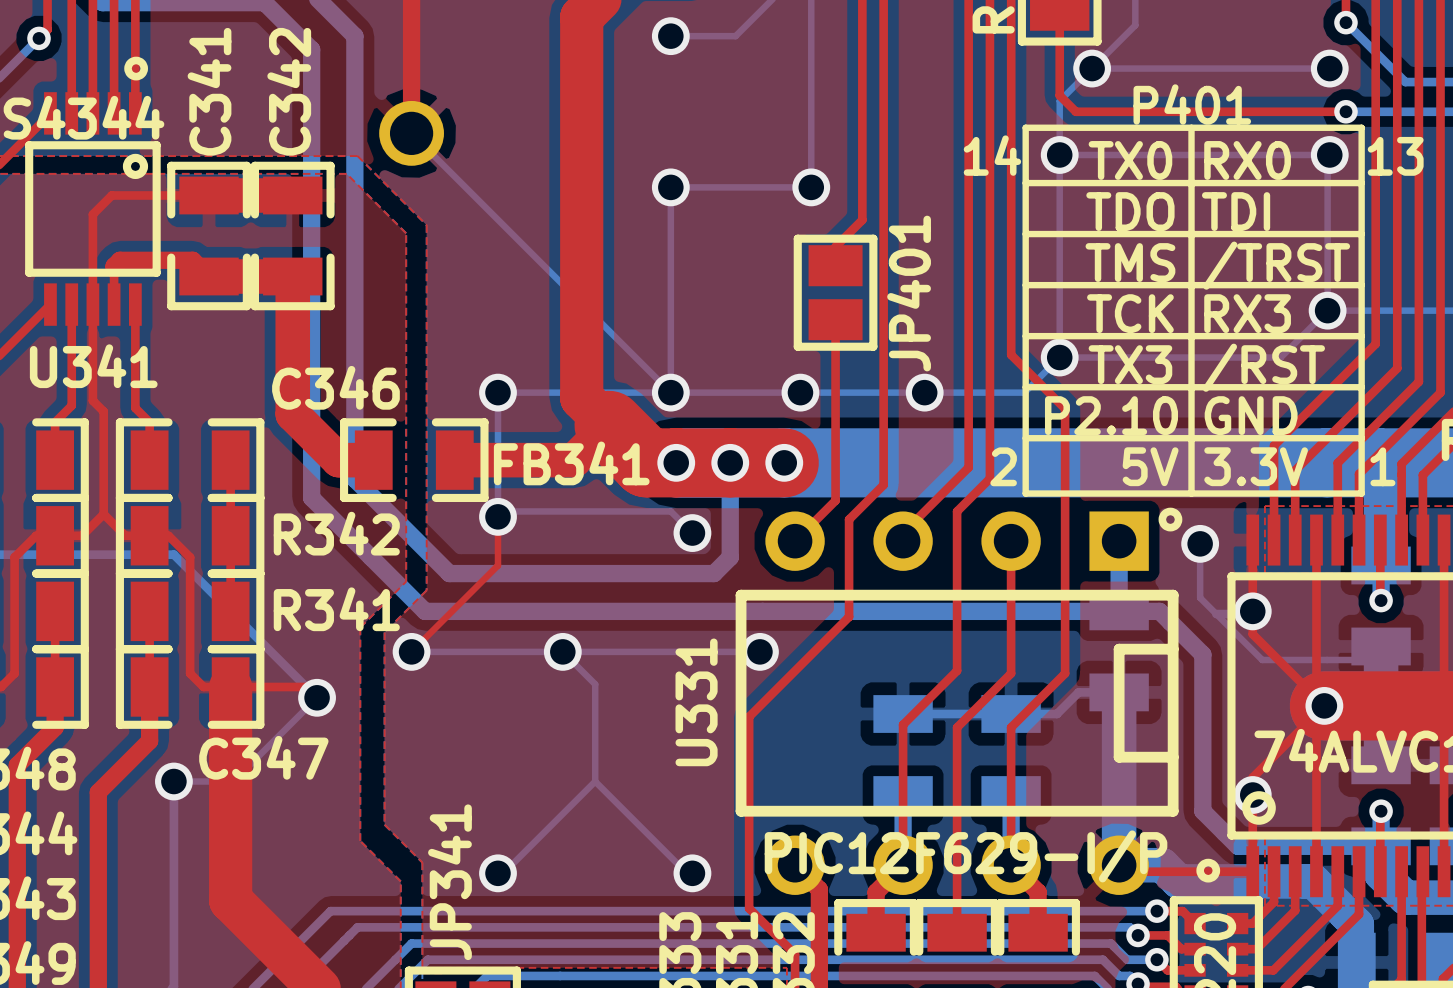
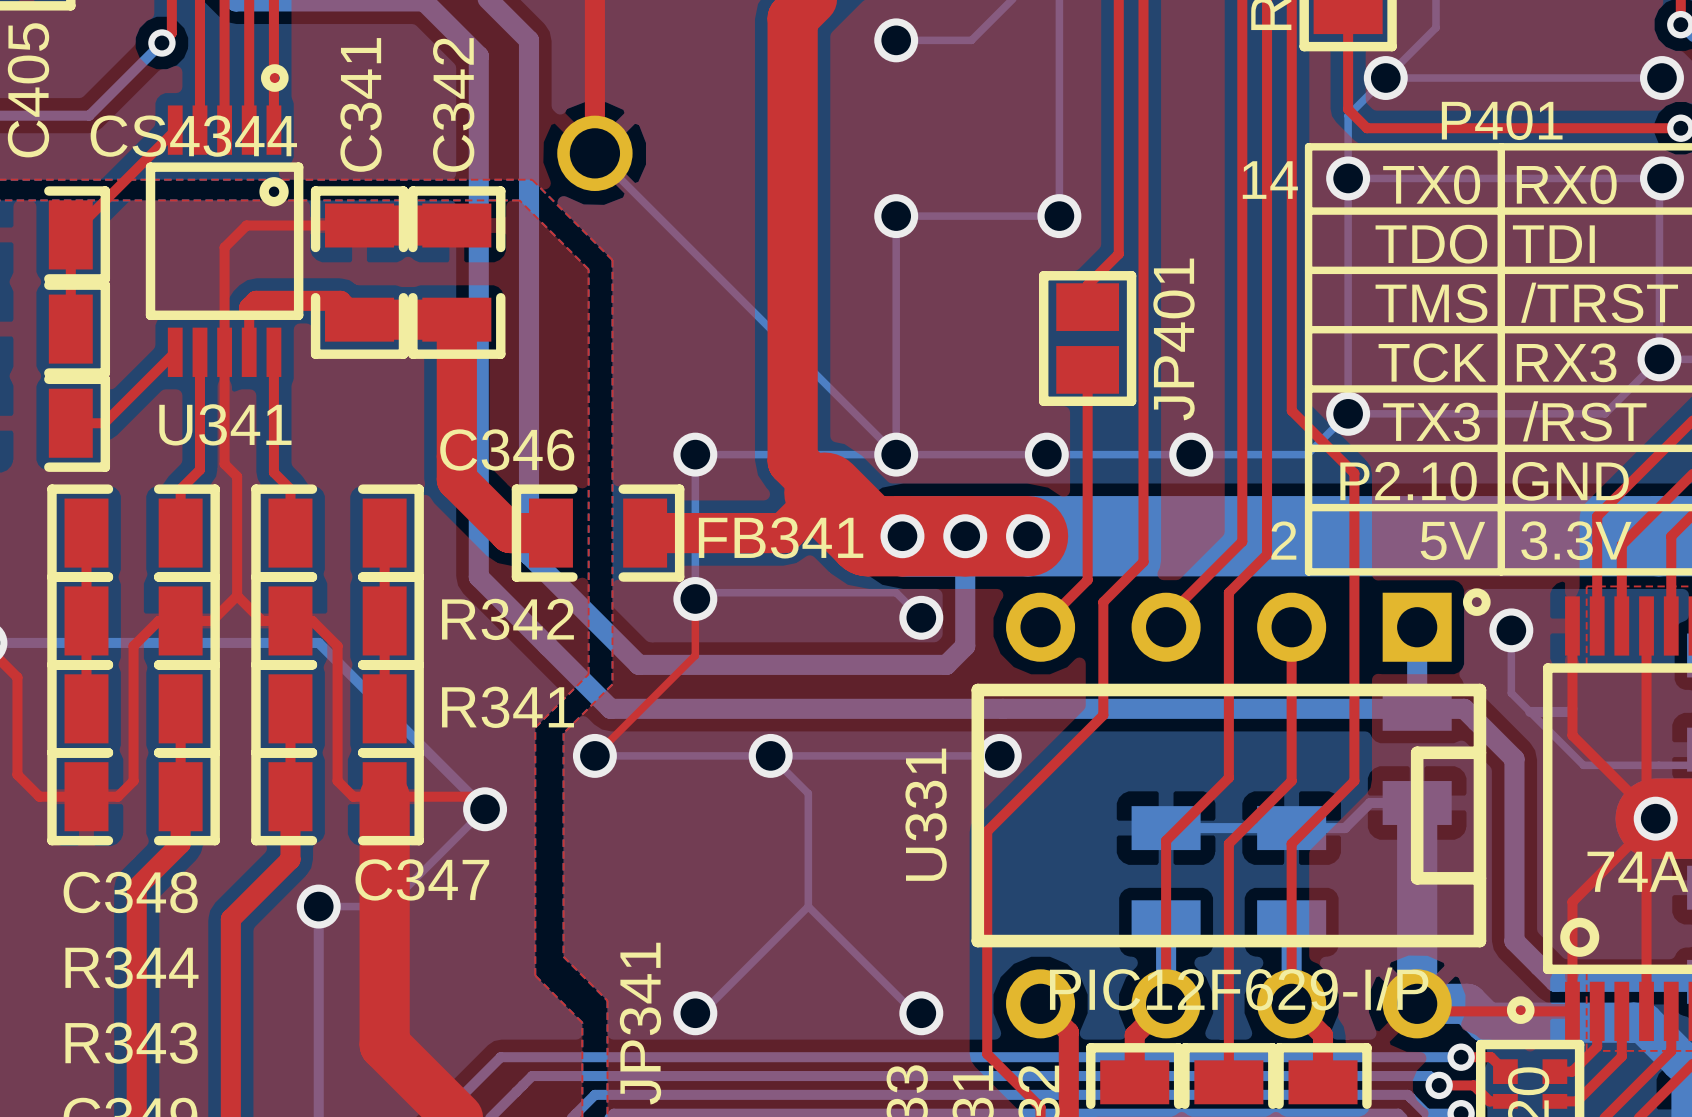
via: (1252, 611) -> none
via: (1252, 795) -> none

